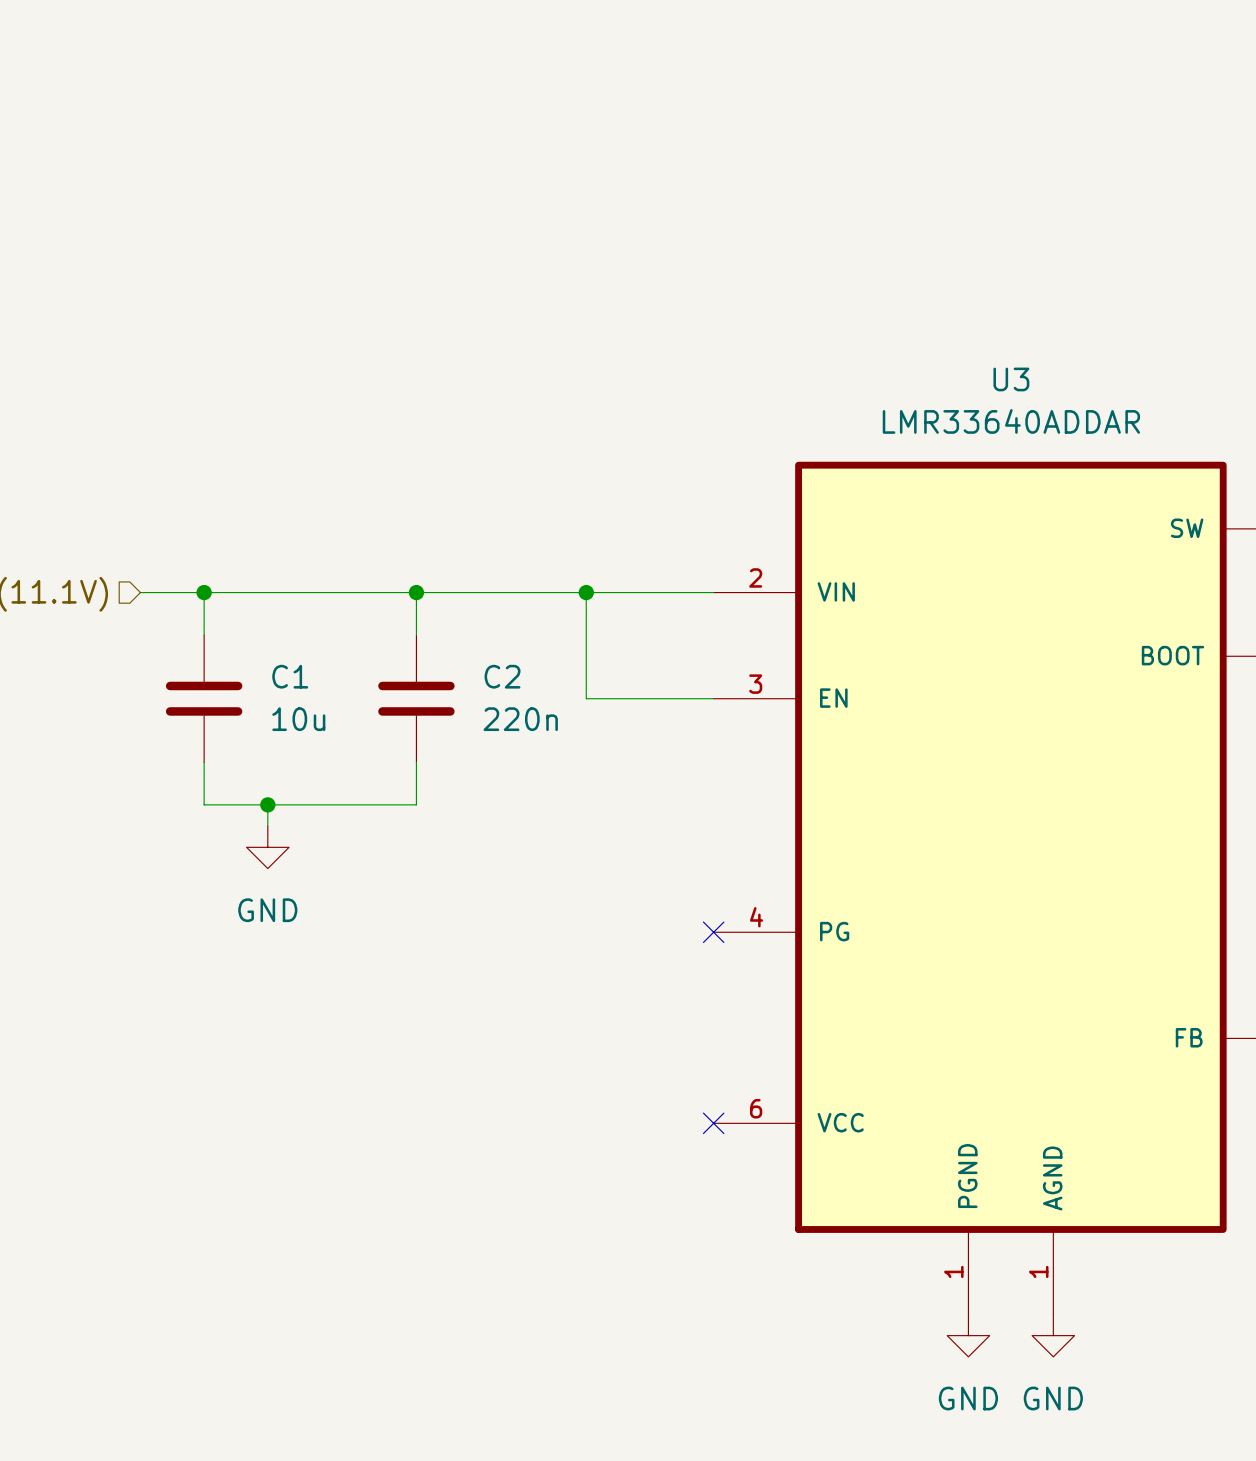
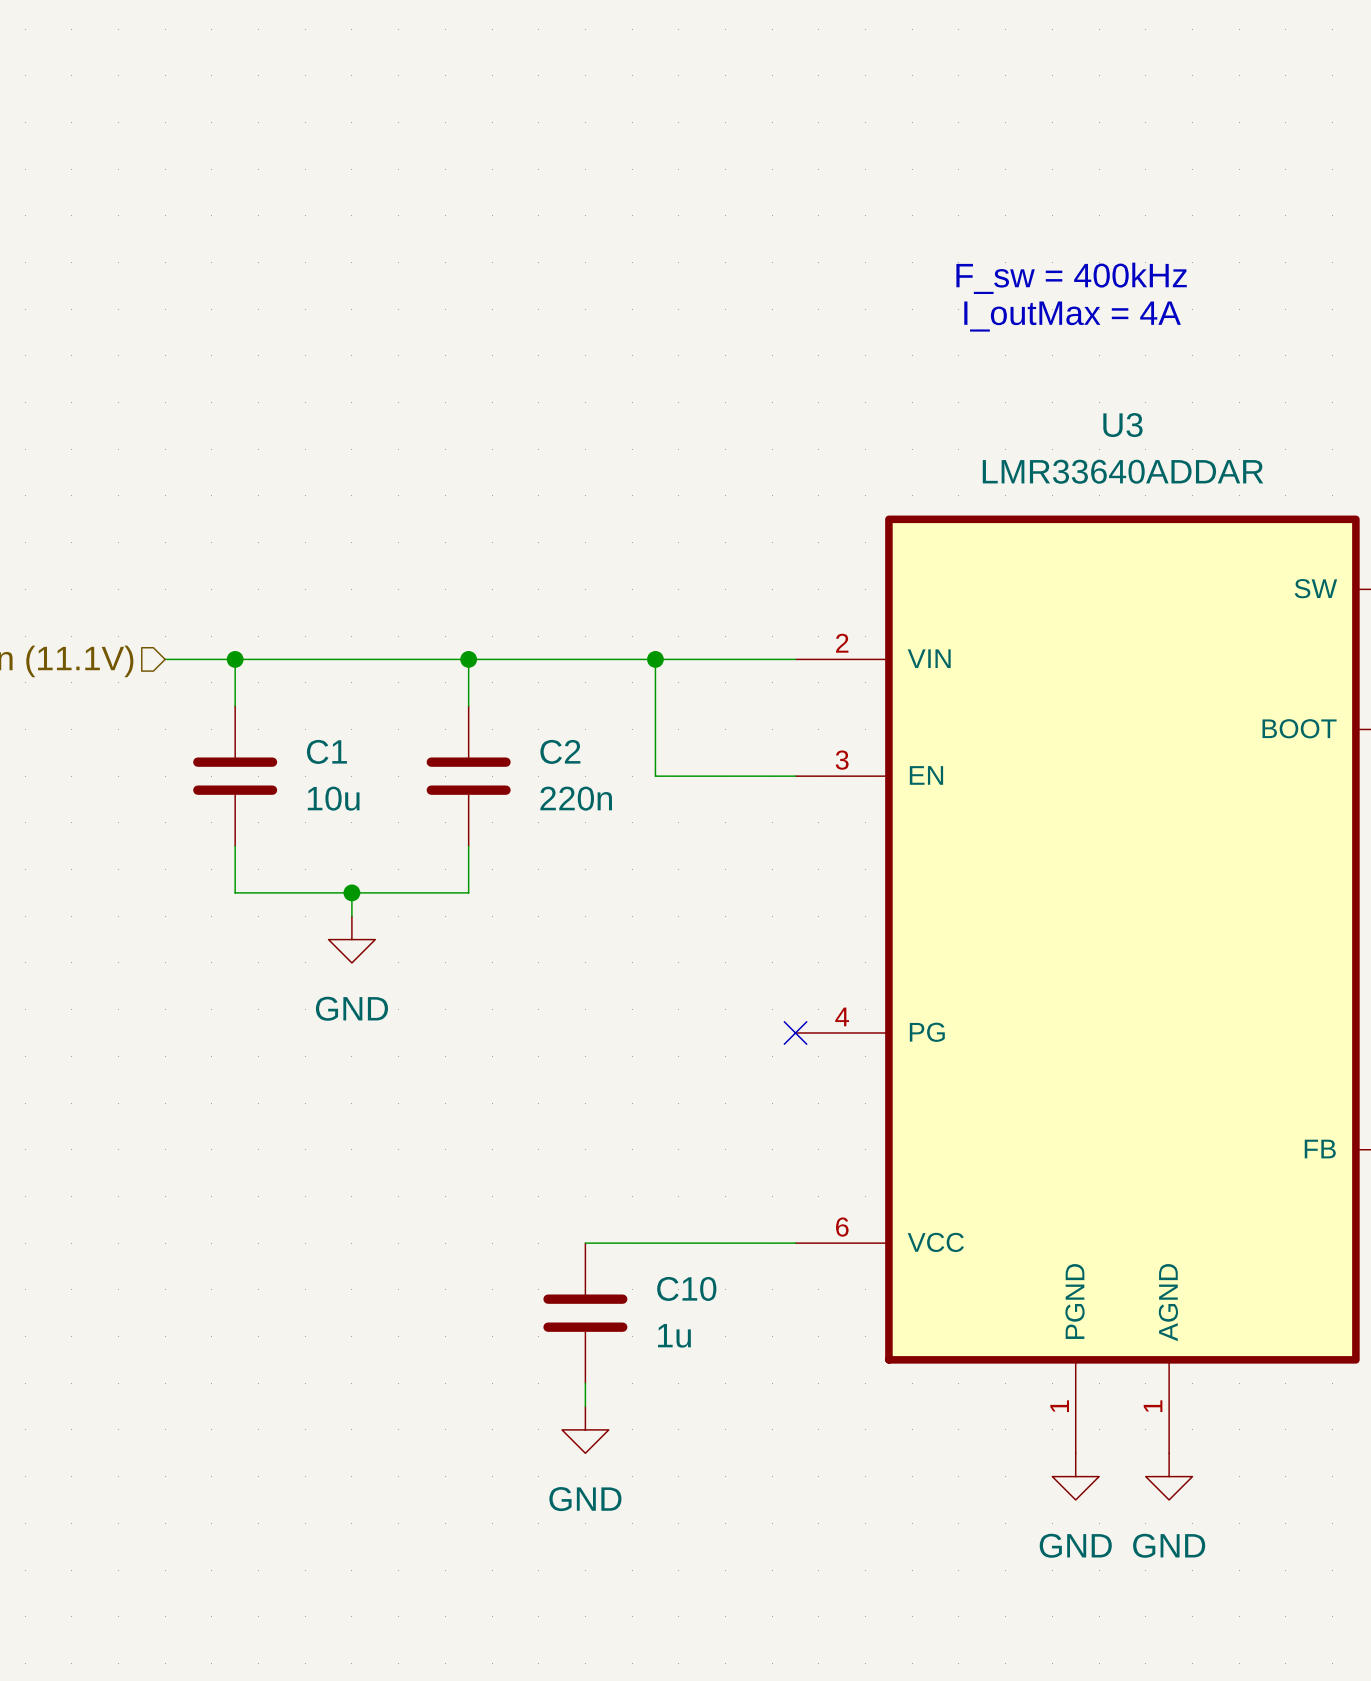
text: none -> F_sw = 400kHz (1071, 278)
text: none -> I_outMax = 4A (1072, 316)
wire: (267, 804) (267, 826) -> (351, 892) (351, 916)
junction position: (267, 804) -> (351, 892)
power symbol position: GND (267, 847) -> GND (351, 939)
wire: none -> (585, 1243) (795, 1243)
no-connect mark: (713, 1123) -> none
C10: none -> 1u (585, 1313)
wire: none -> (585, 1383) (585, 1406)
power symbol: none -> GND (585, 1429)

